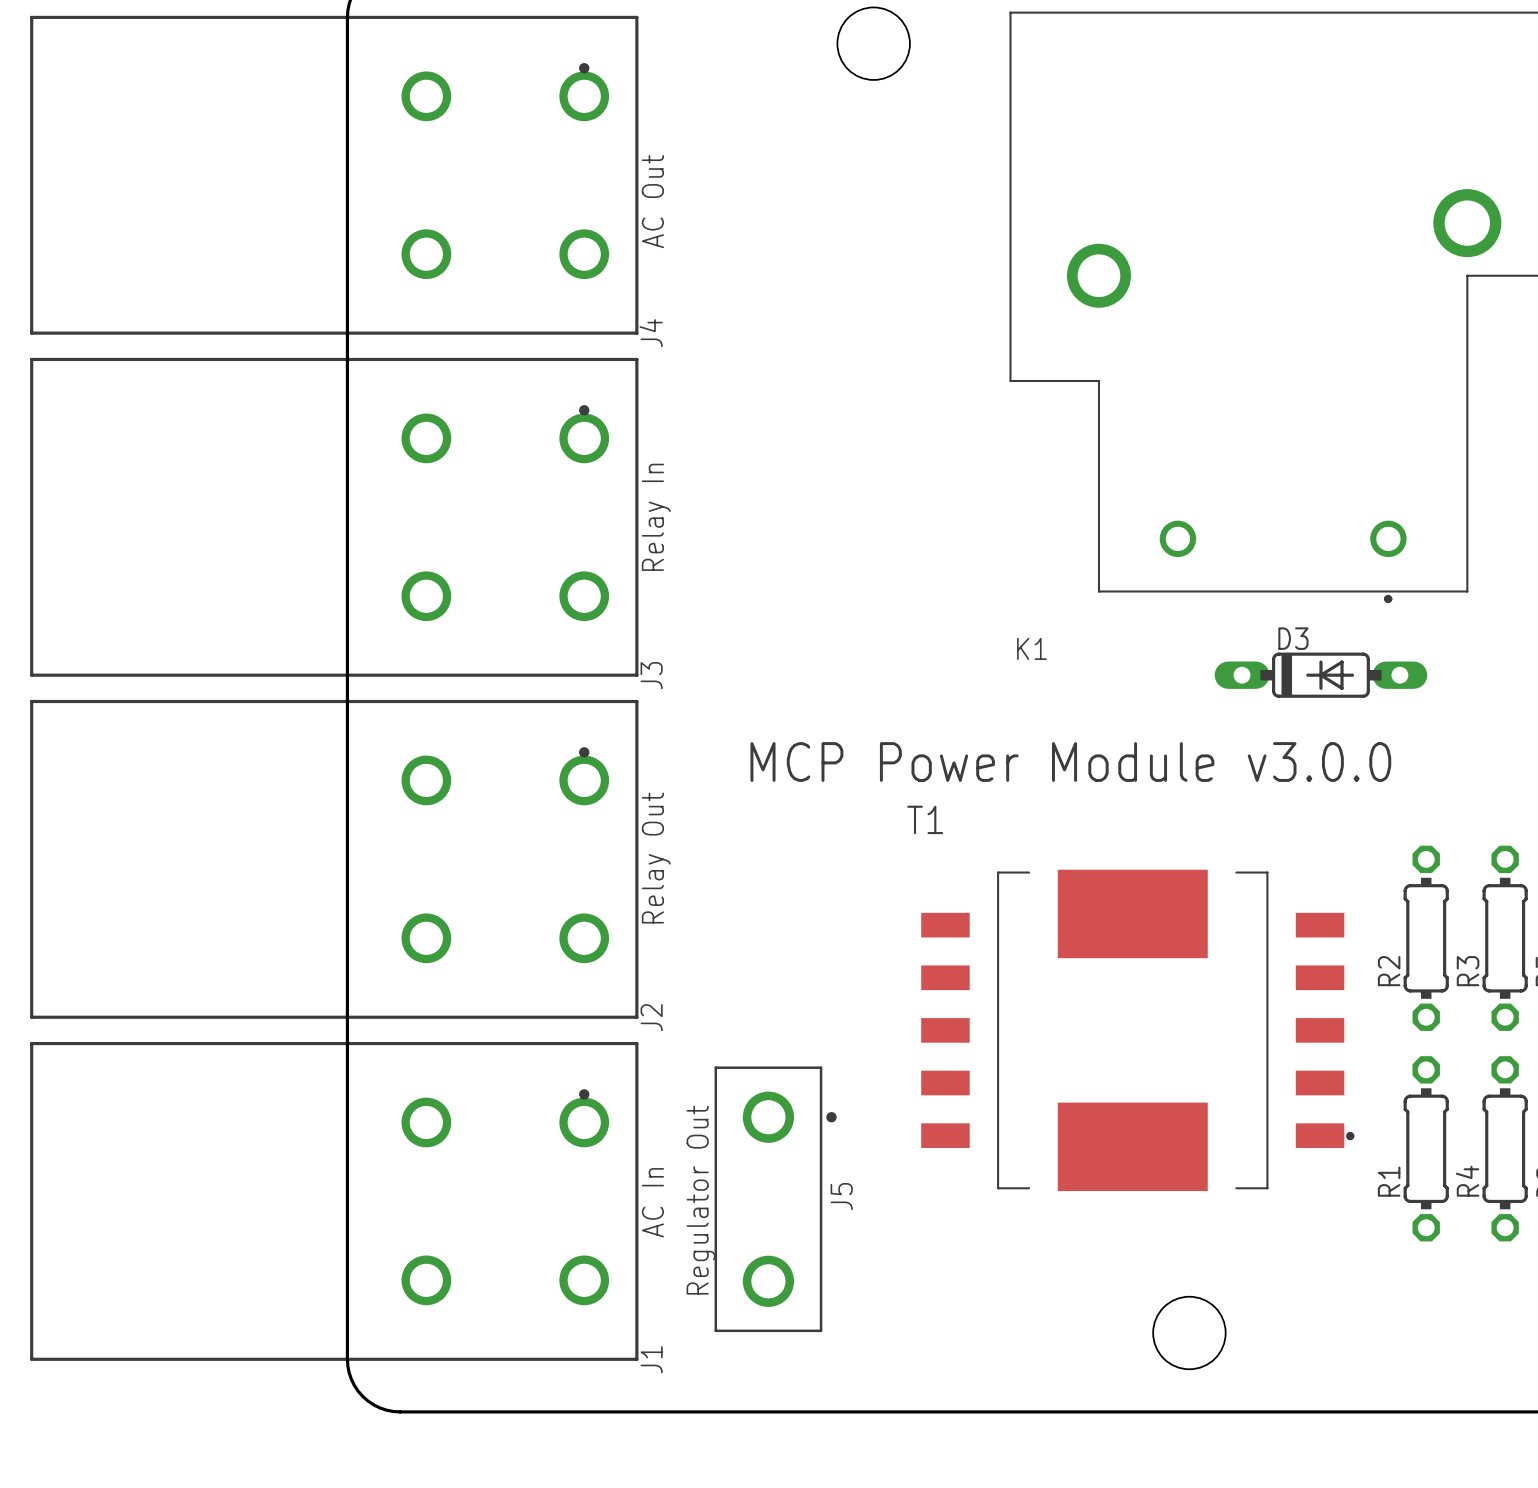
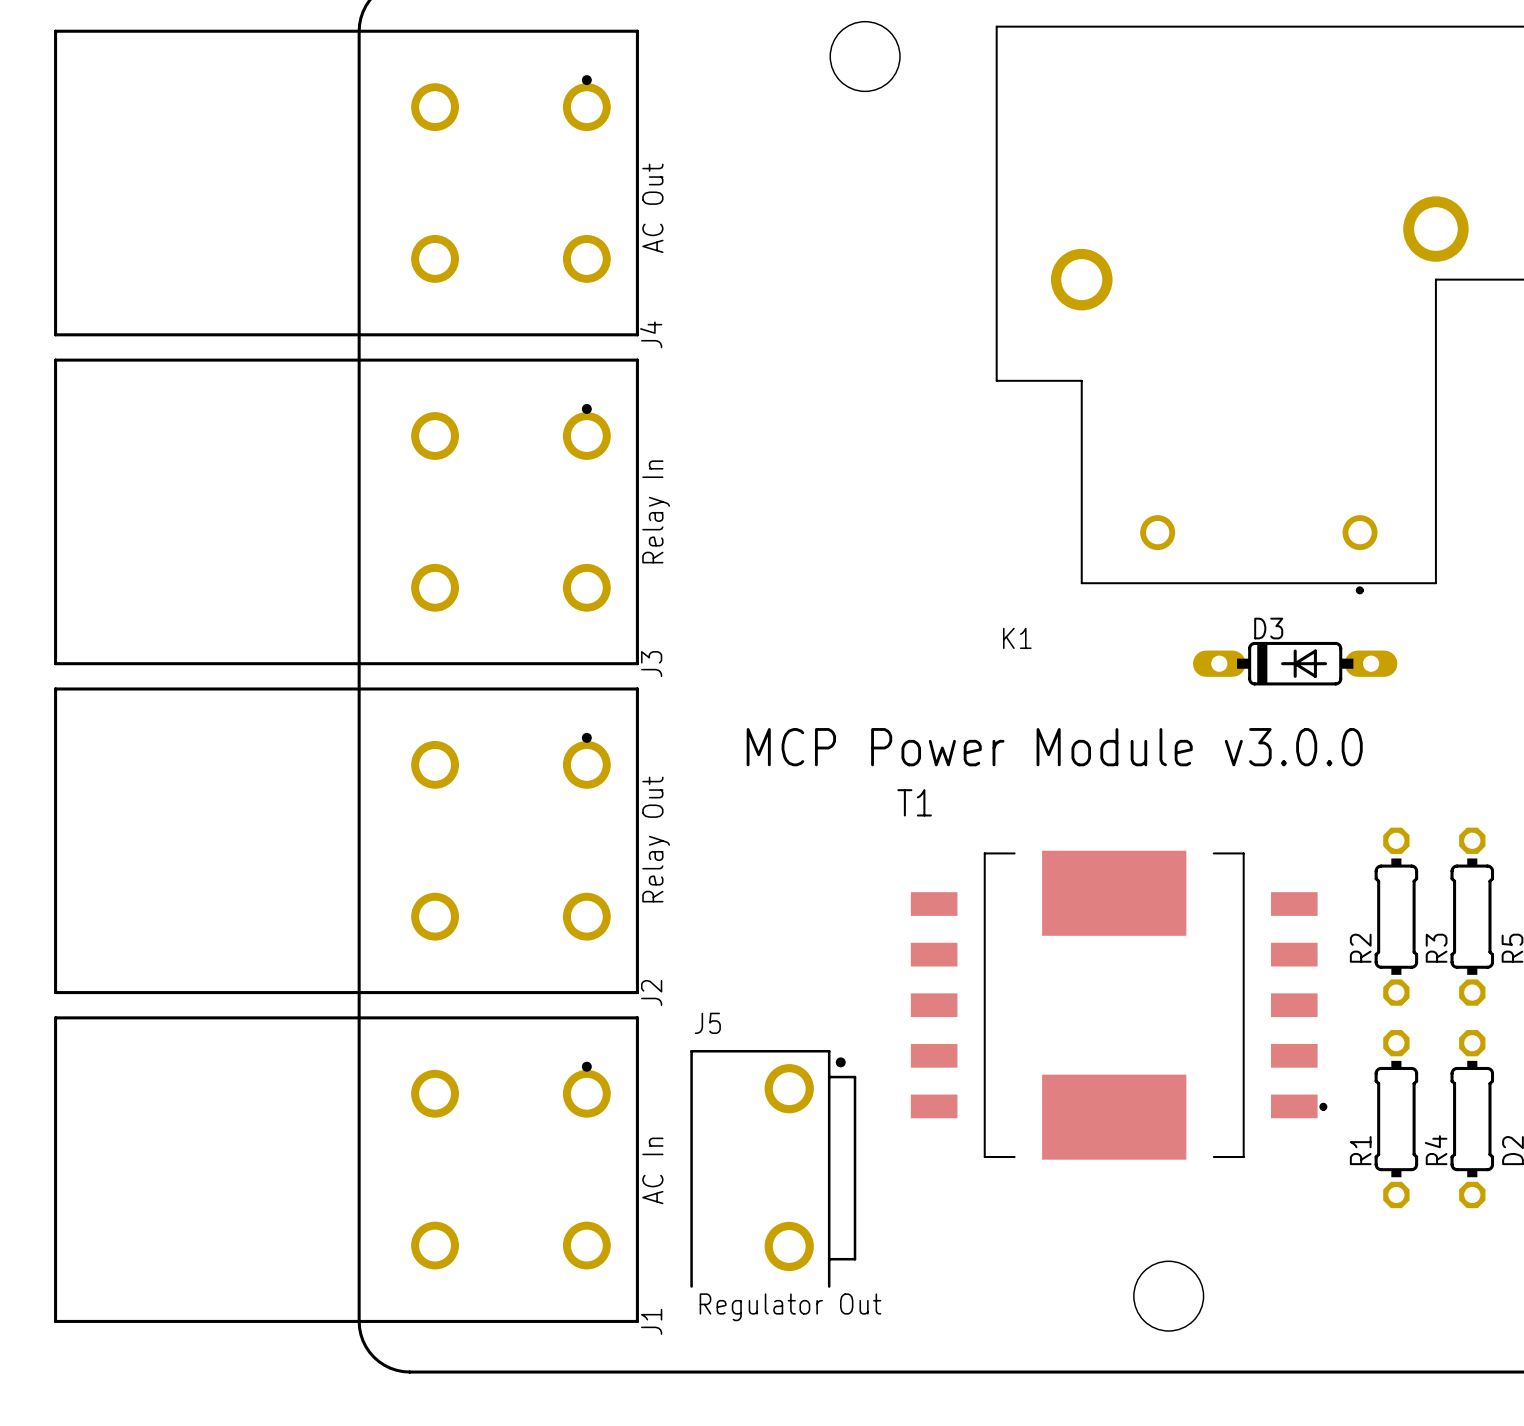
J5 footprint: [714, 1066, 837, 1333] -> [690, 1049, 857, 1288]
J5 name position: J5 (841, 1196) -> J5 (707, 1023)
text rotation: 0° (701, 1200) -> 90° clockwise (790, 1307)

